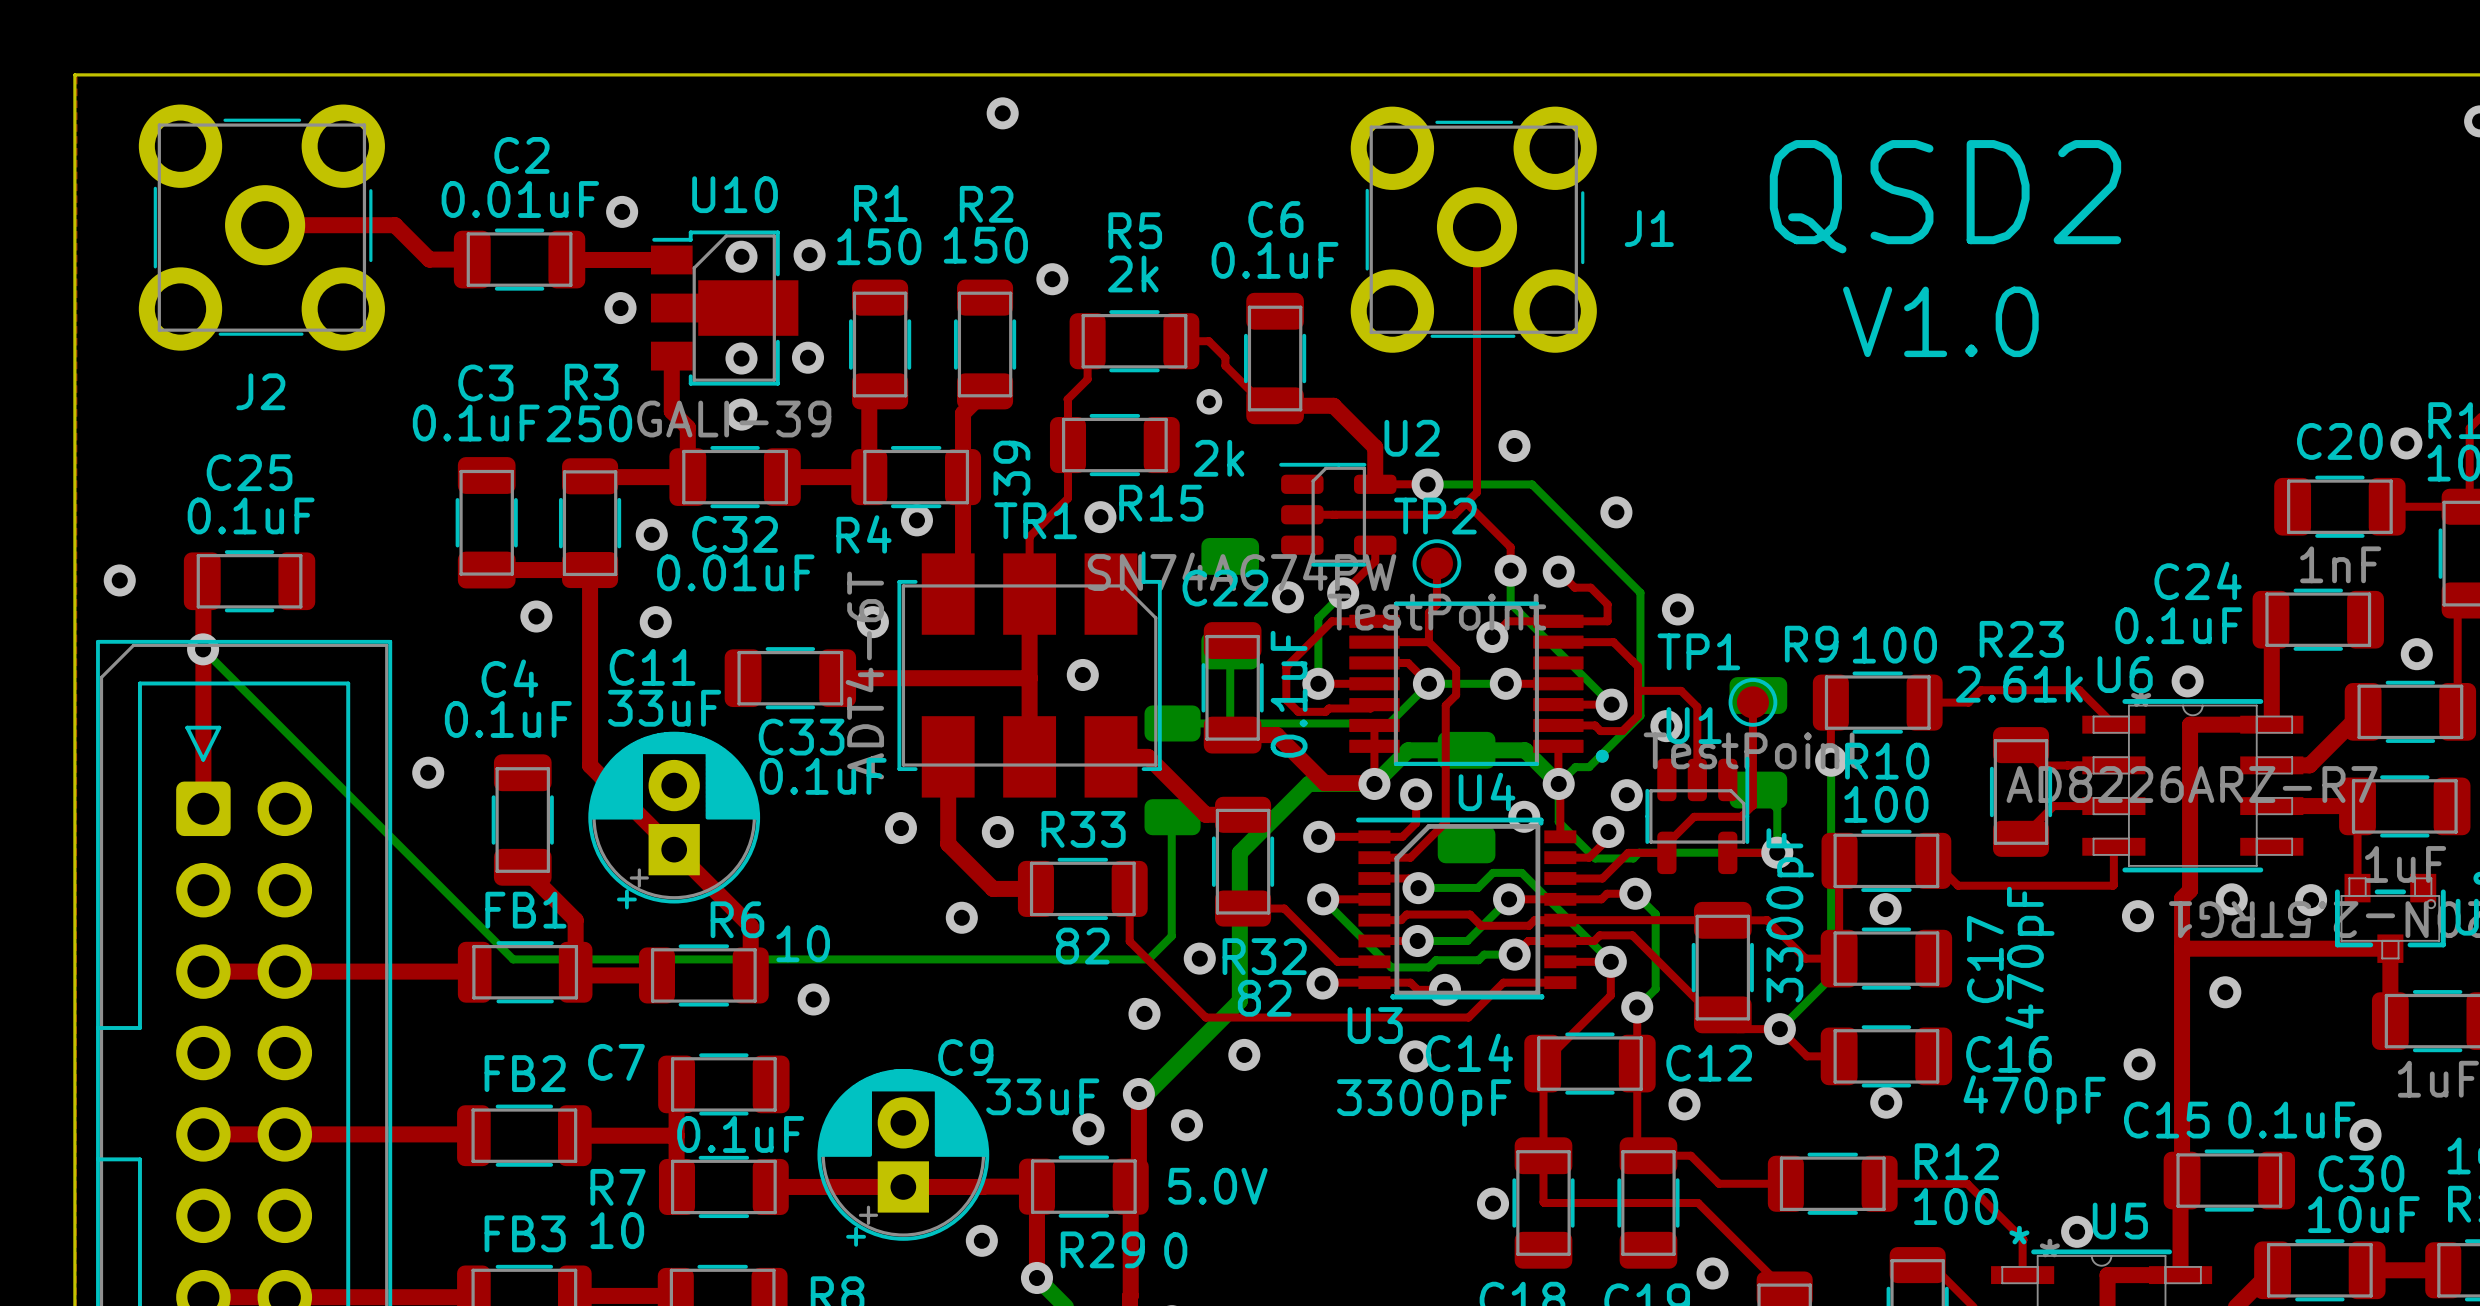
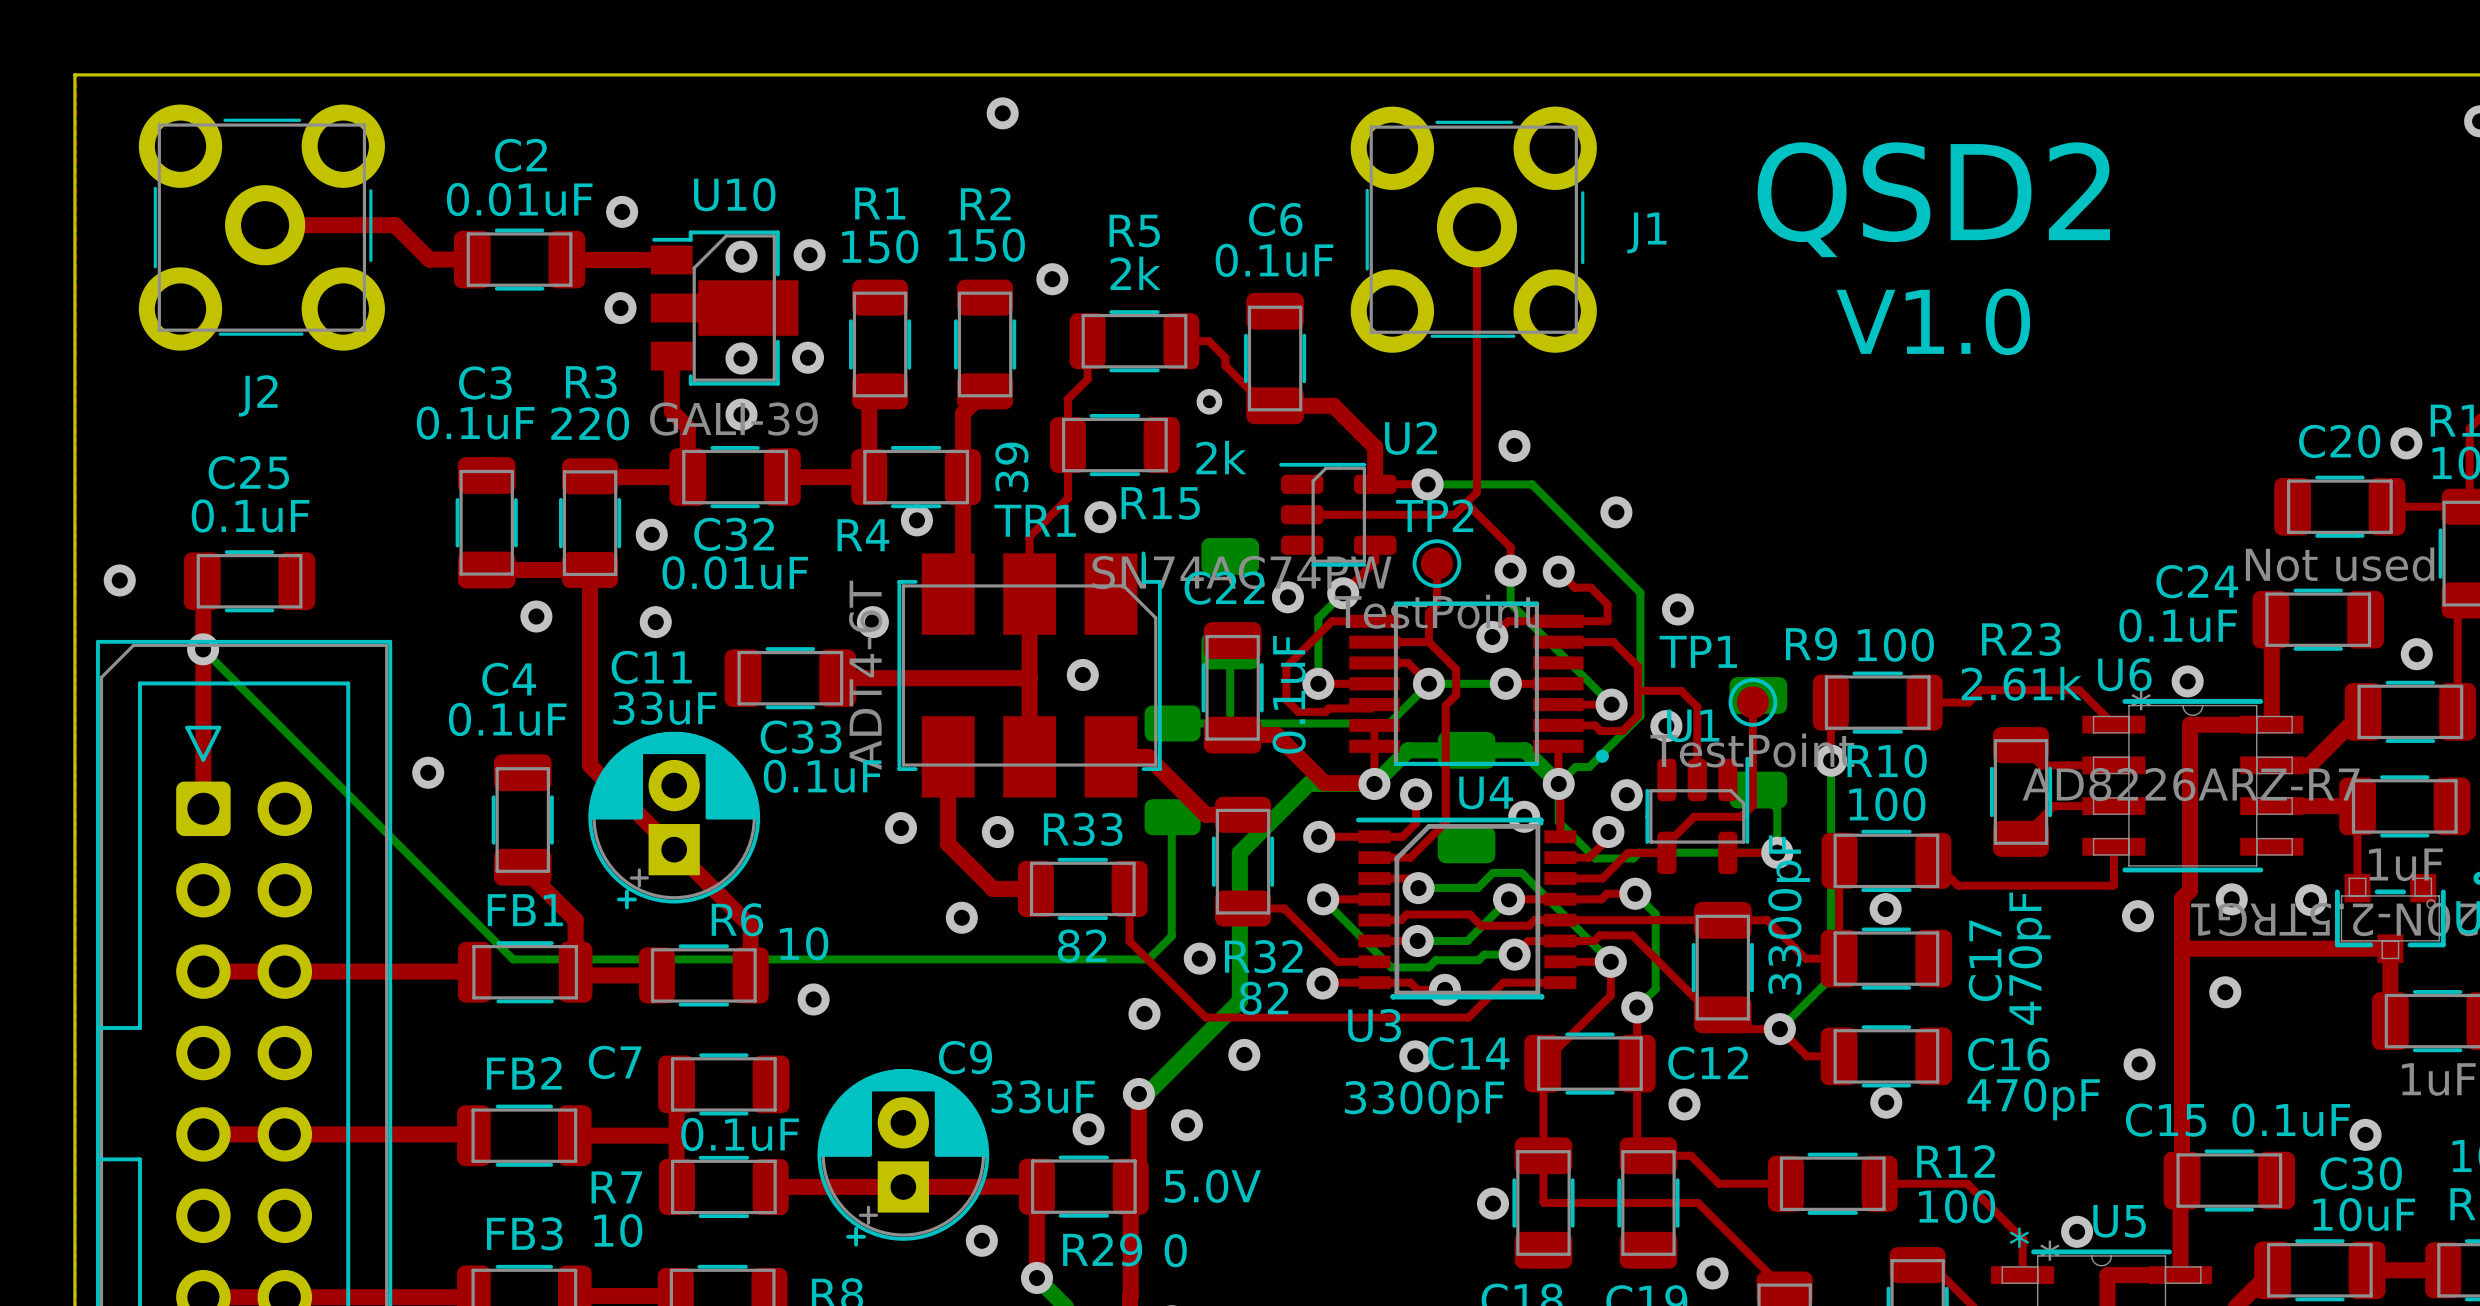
R3 value: 250 (589, 423) -> 220 (590, 423)
C20 value: 1nF (2340, 564) -> Not used (2340, 564)

